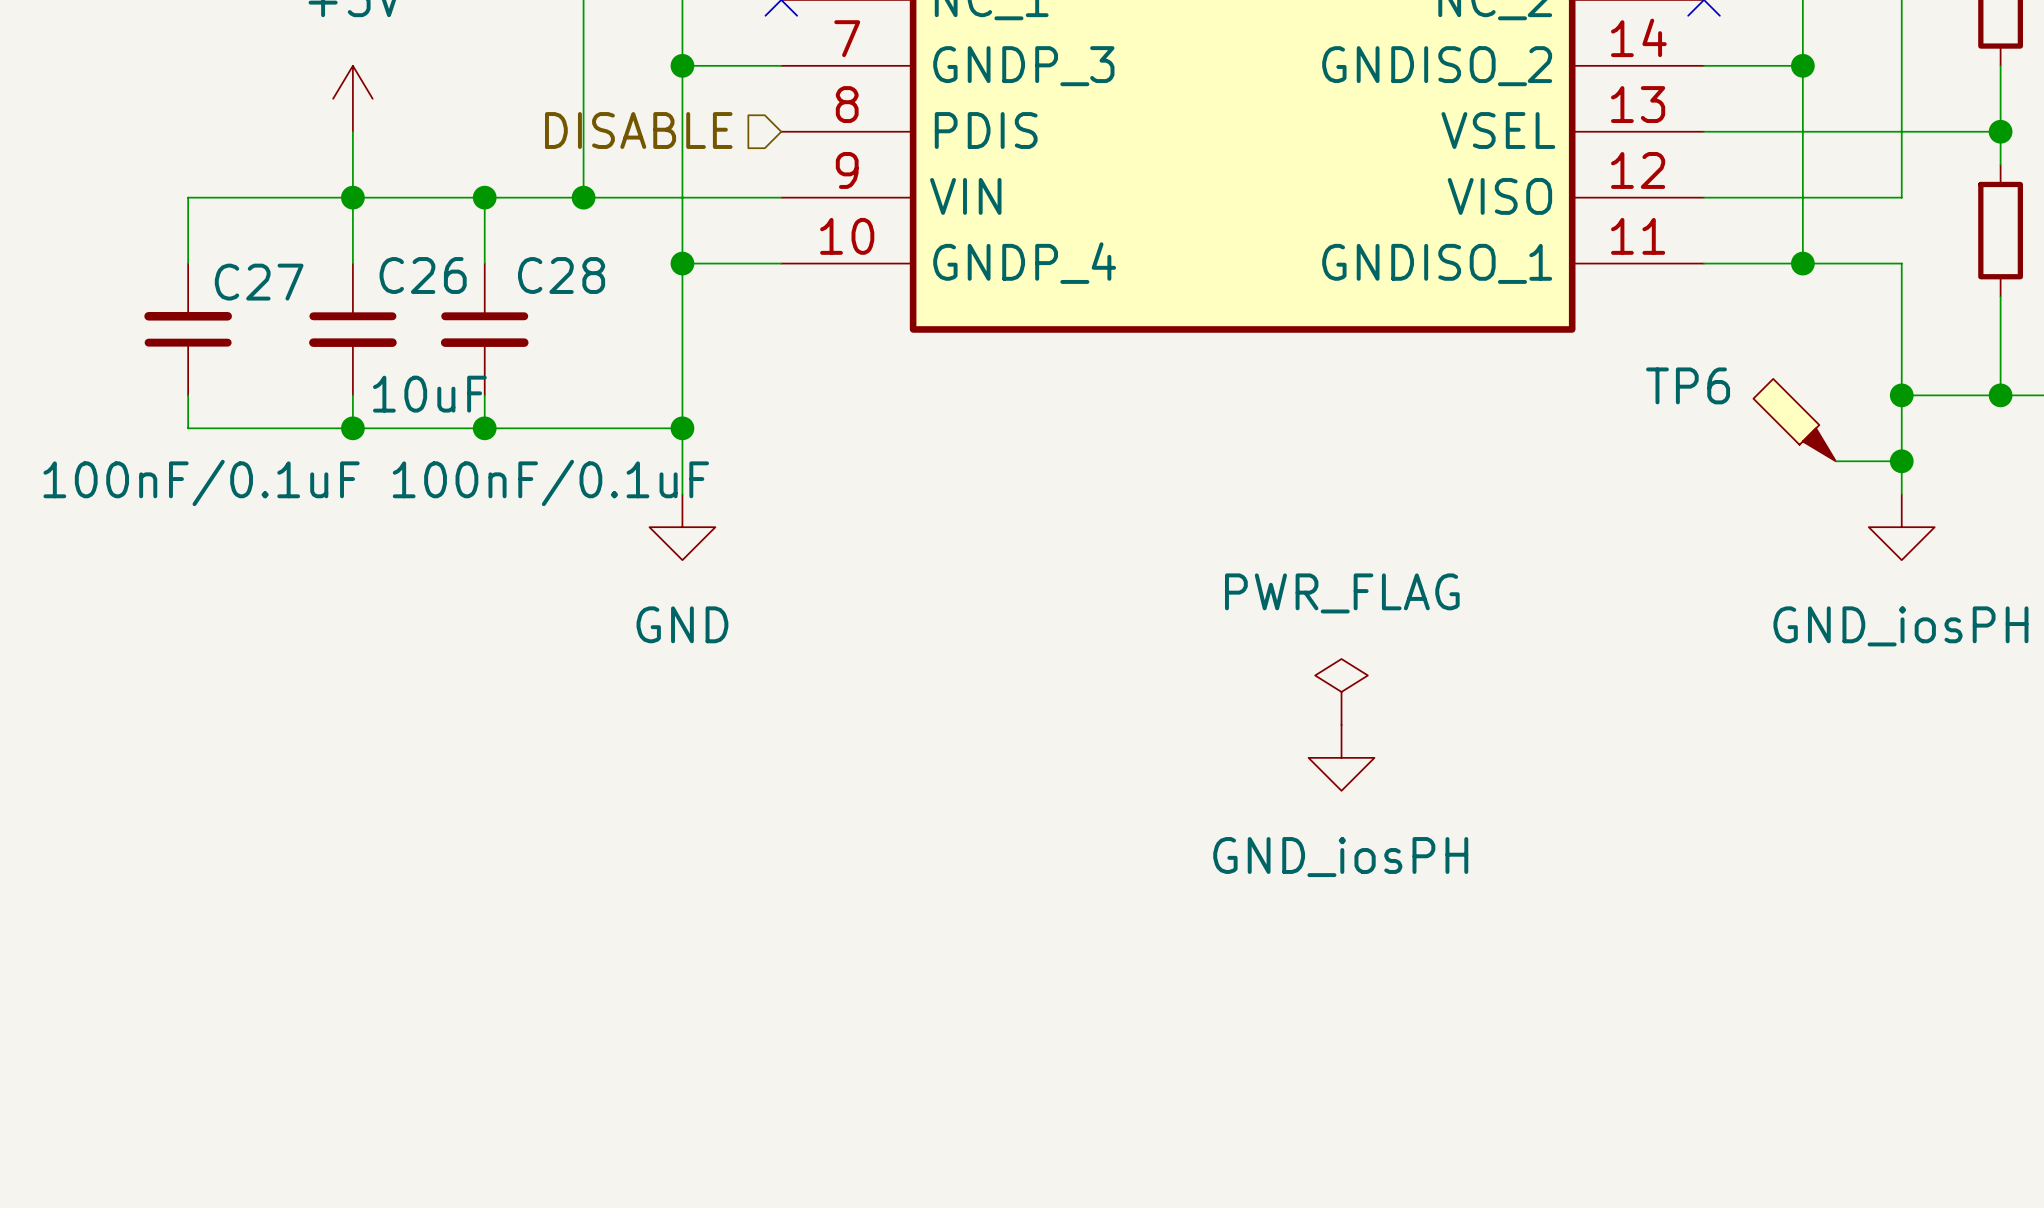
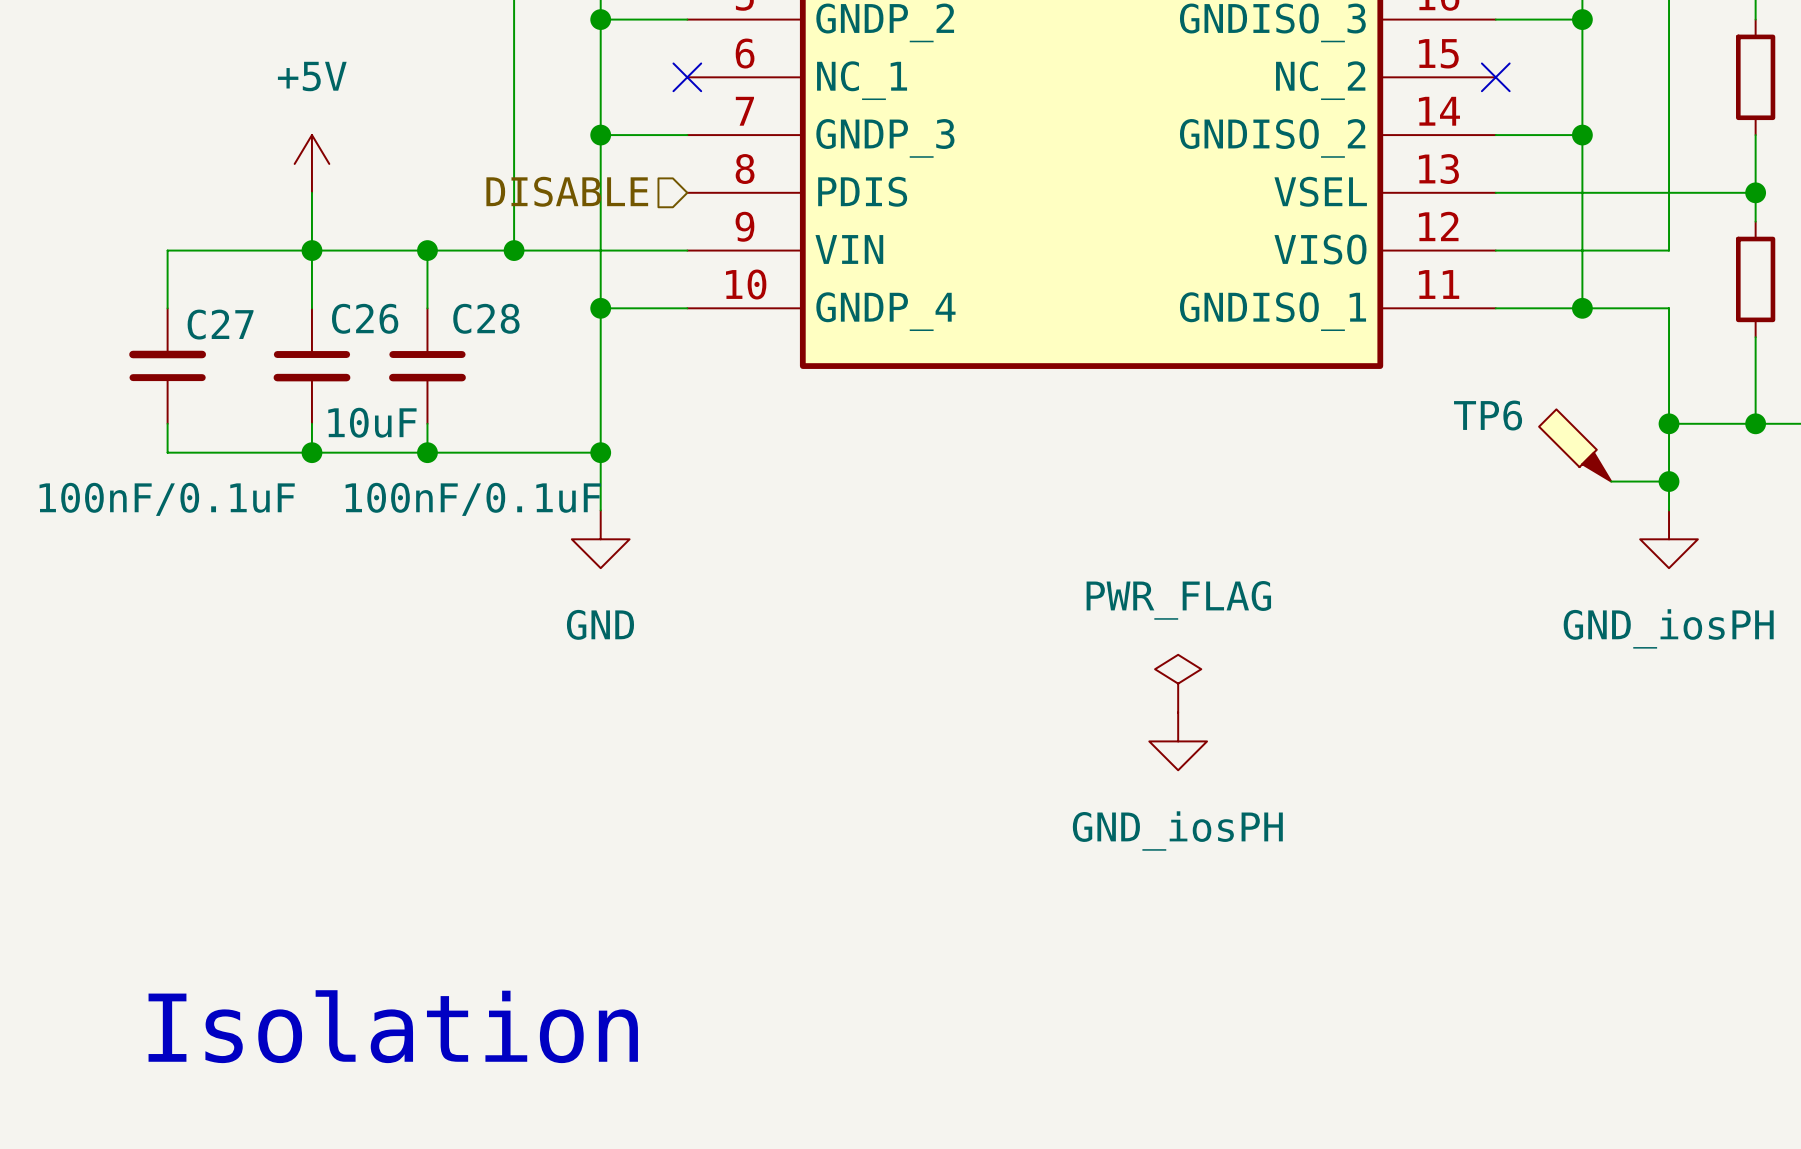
text: none -> Isolation (393, 1026)

